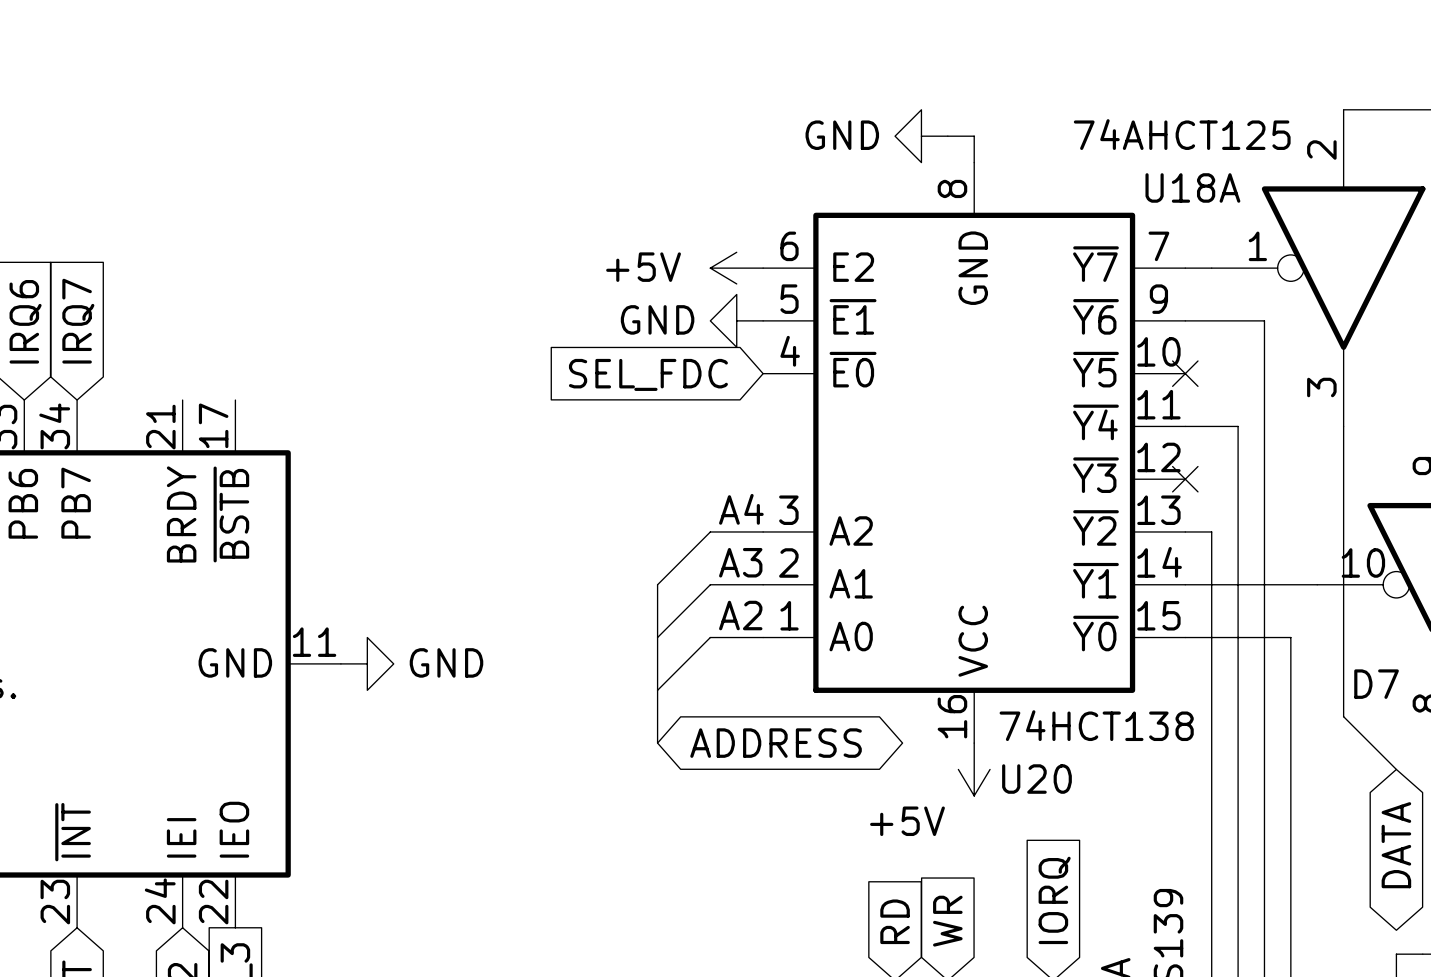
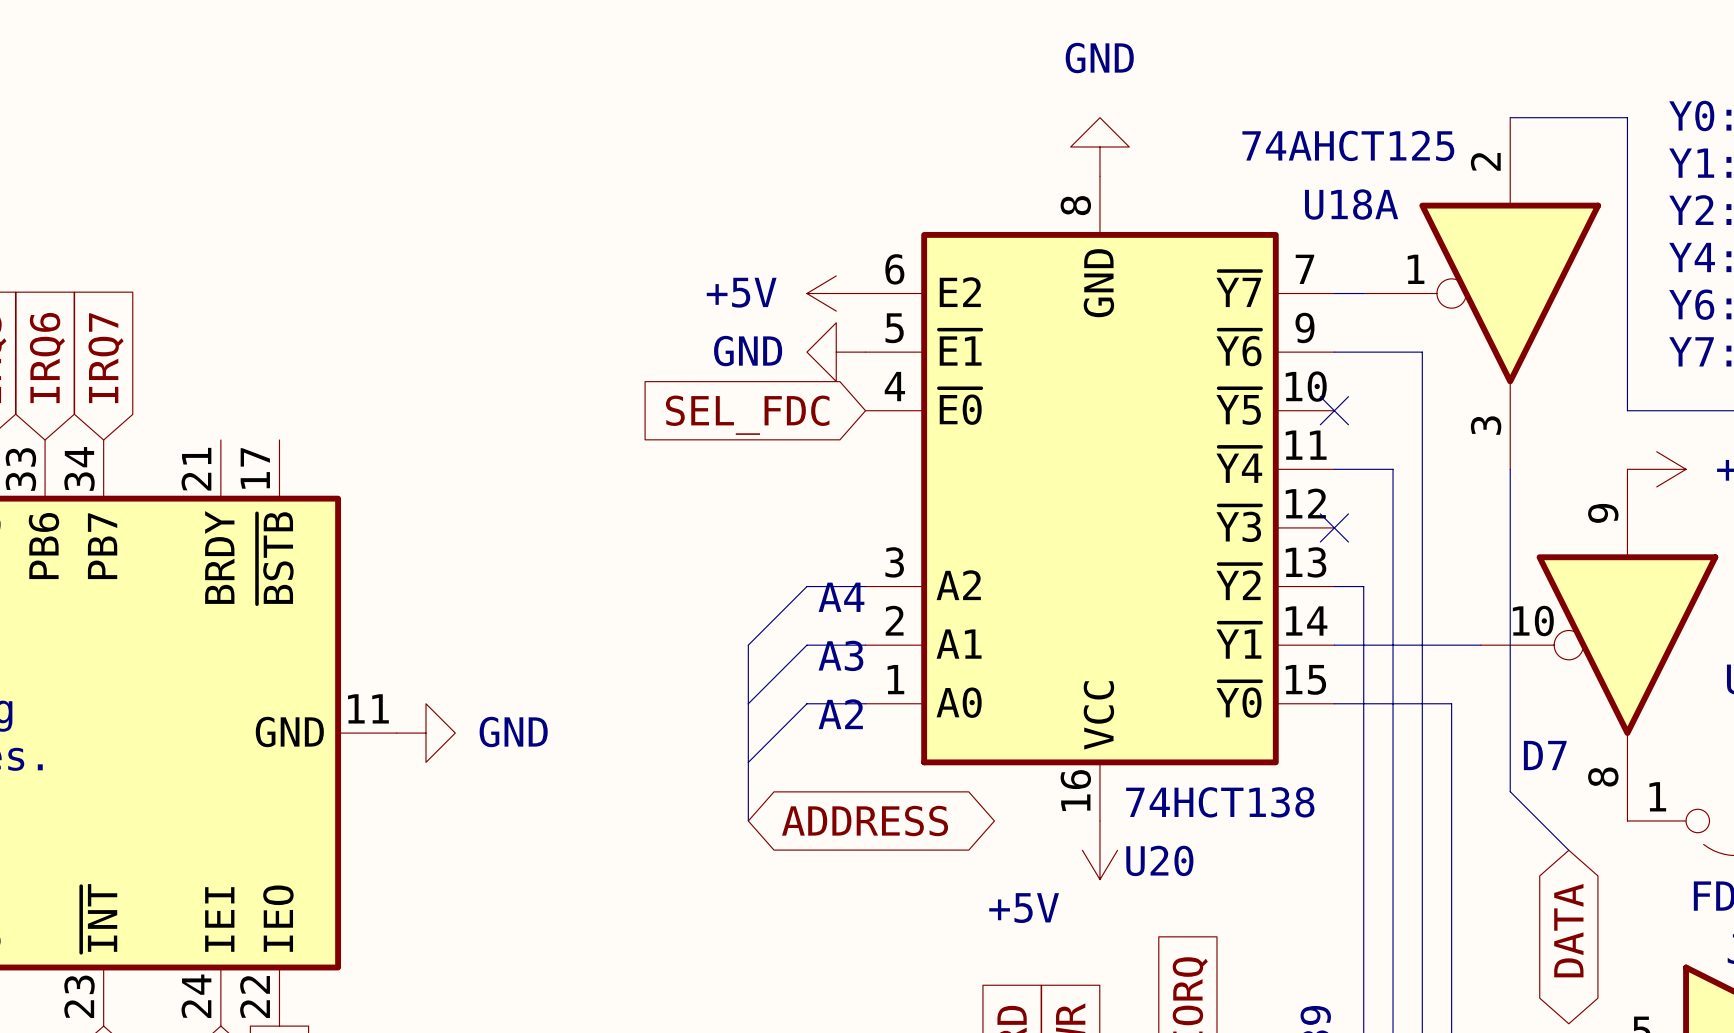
power symbol rotation: 0° (921, 136) -> 90° clockwise (1099, 147)
power symbol position: GND (921, 136) -> GND (1099, 147)
text position: A4 (741, 509) -> A4 (841, 597)
text position: A3 (740, 562) -> A3 (840, 655)
text position: A2 (740, 615) -> A2 (840, 714)

